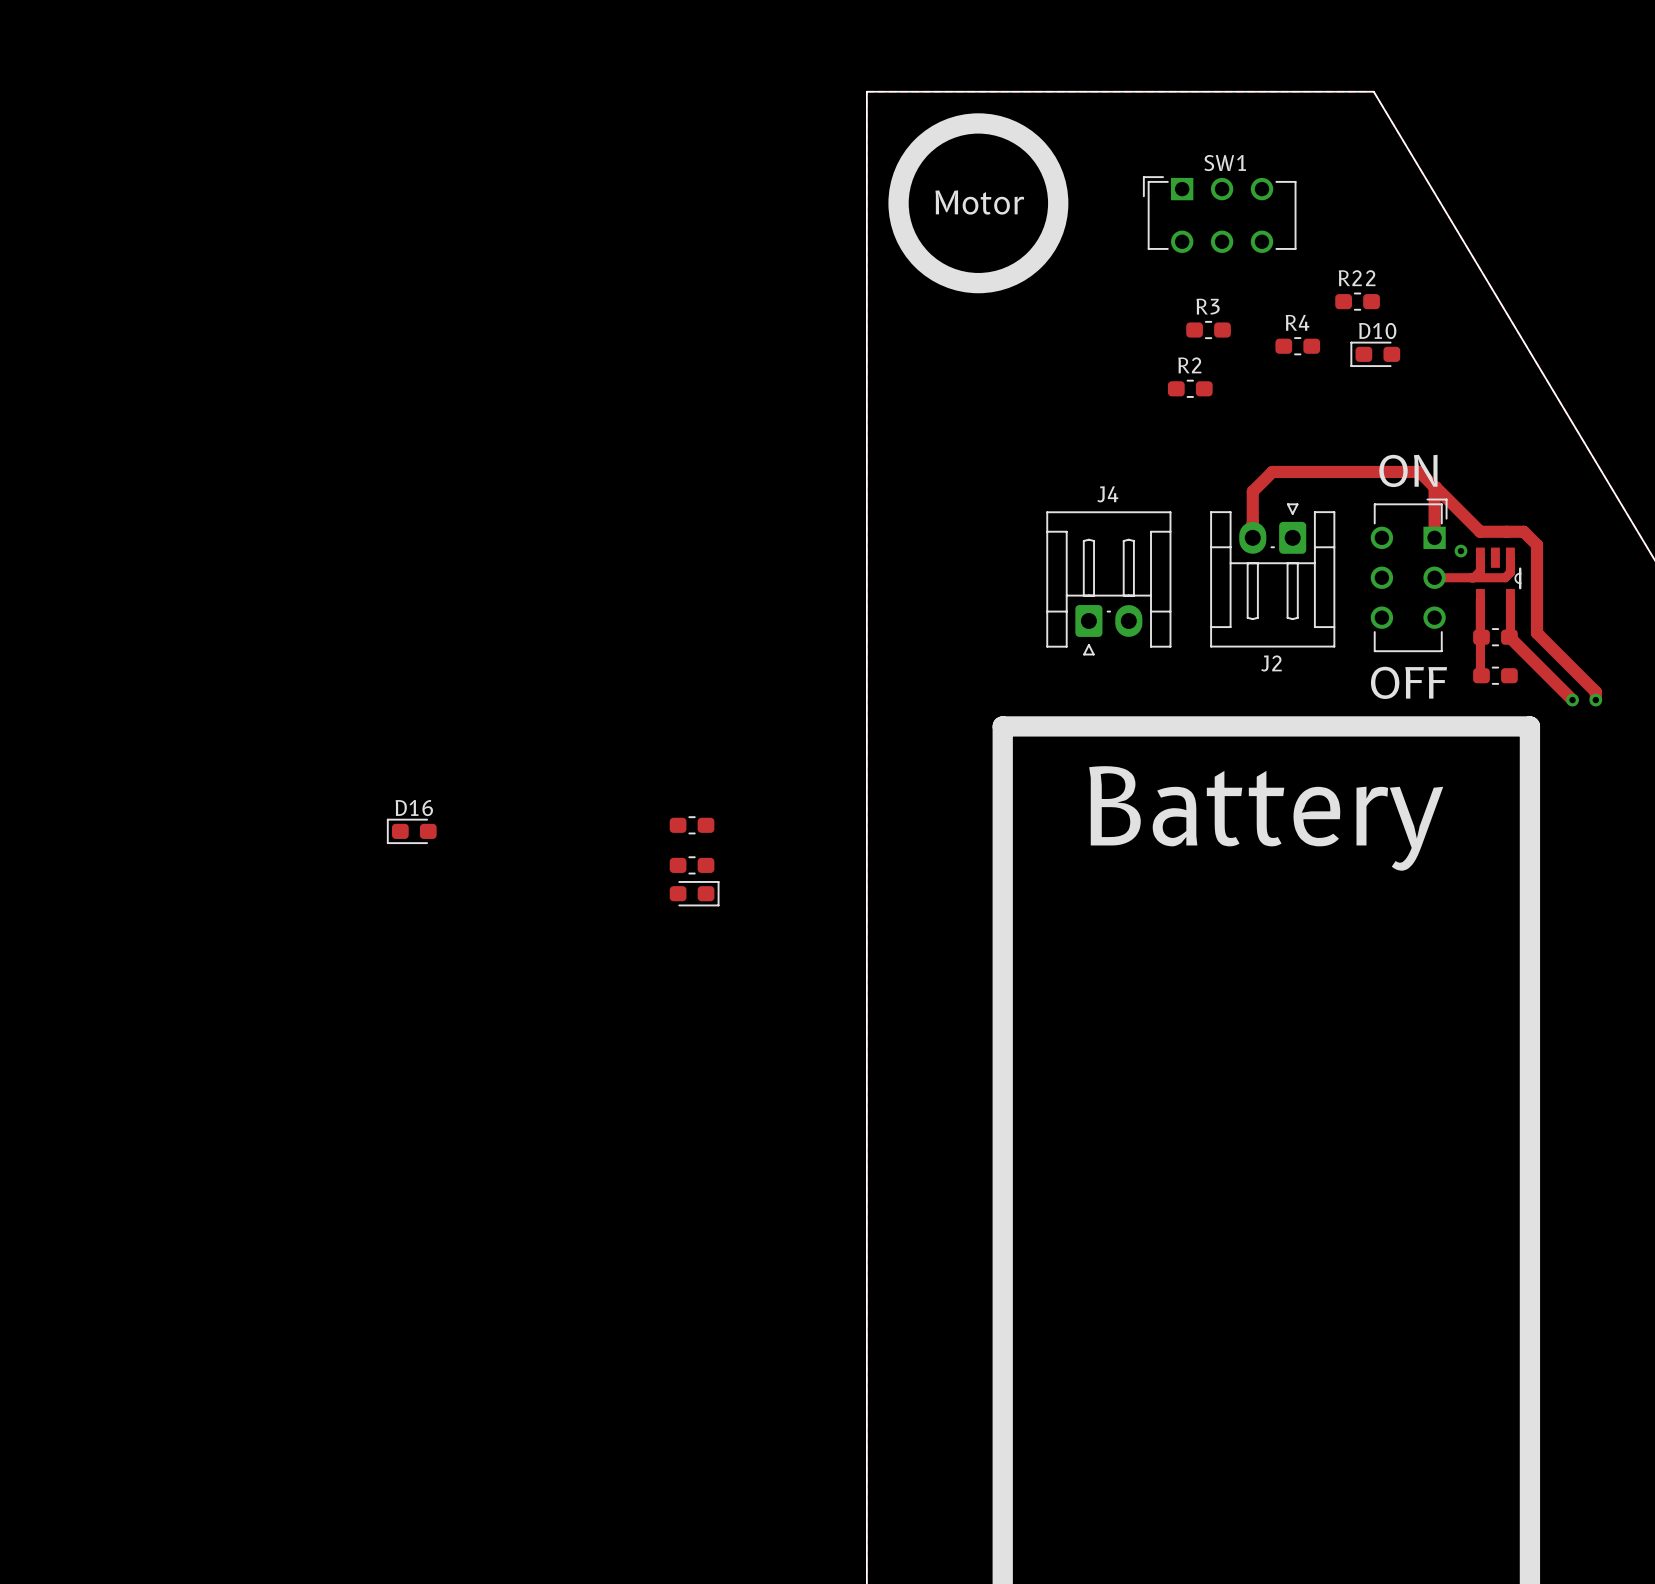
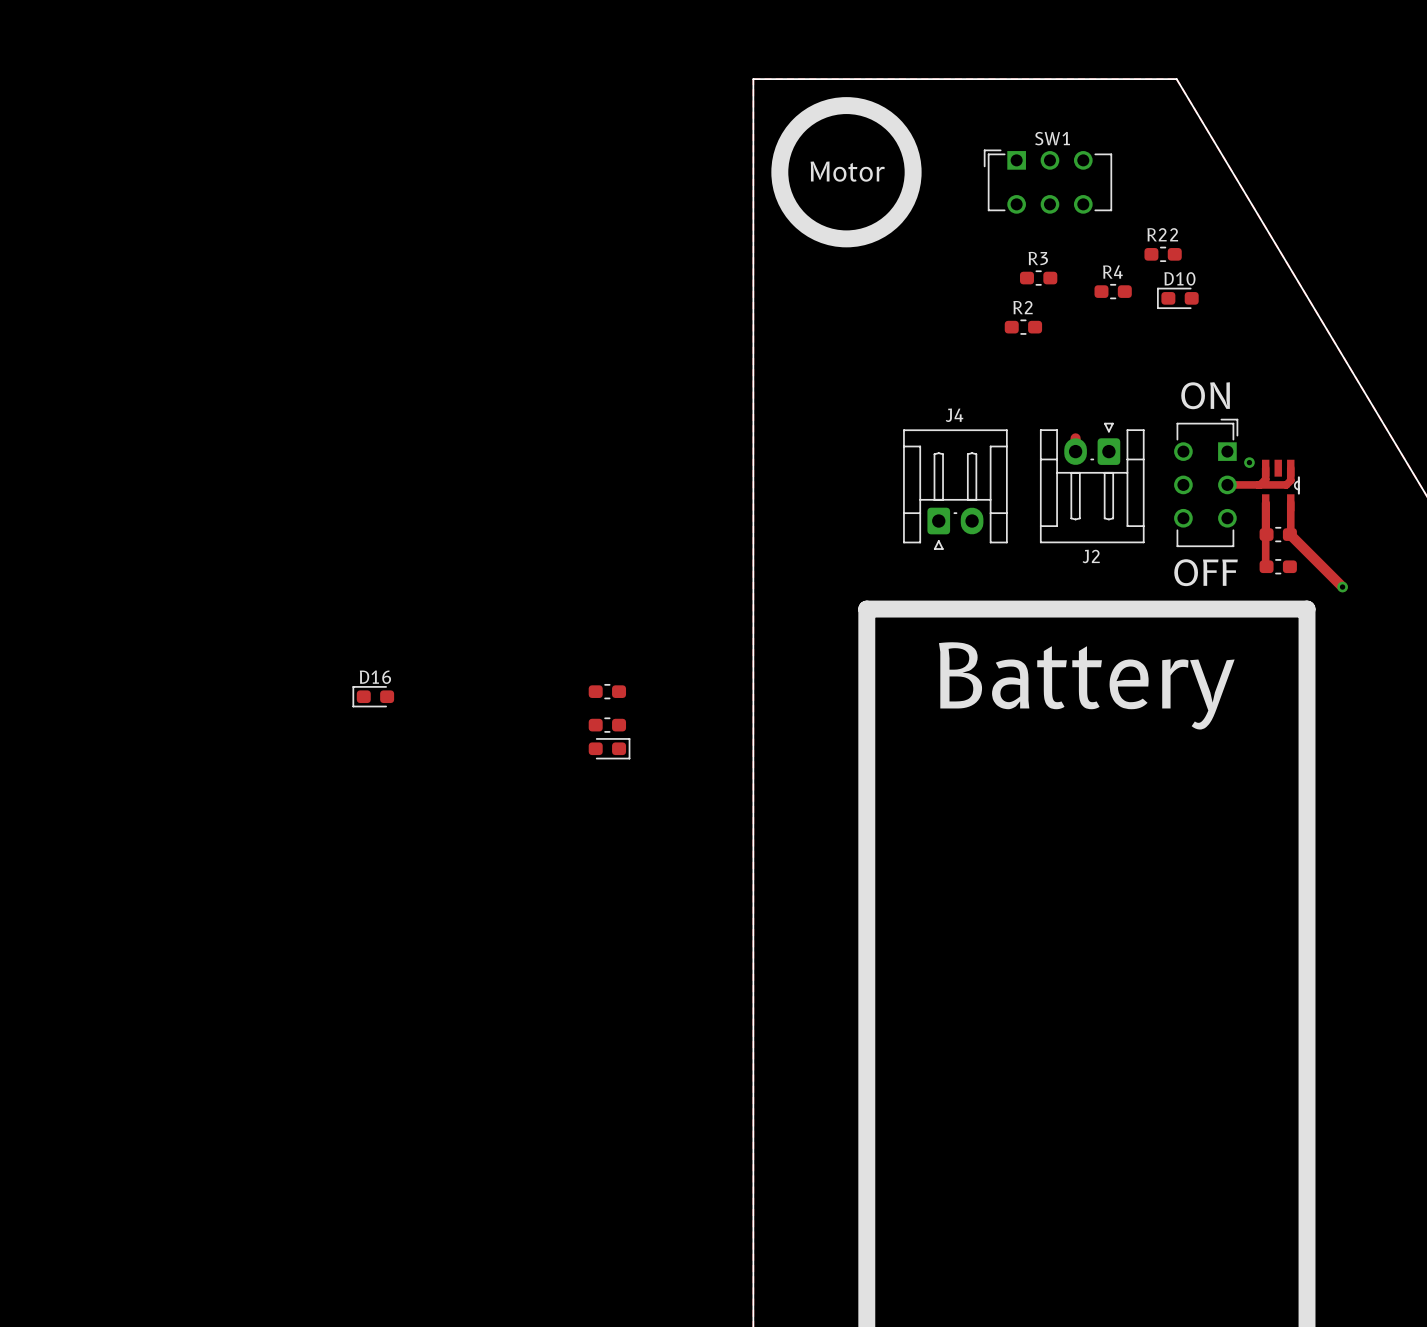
track: (1434, 487) (1434, 537) -> none
track: (1434, 487) (1419, 471) (1272, 471) (1252, 491) (1252, 522) -> none
track: (1434, 487) (1480, 531) (1523, 531) (1537, 544) (1537, 633) (1595, 691) (1595, 699) -> none
via: (1595, 700) -> none

